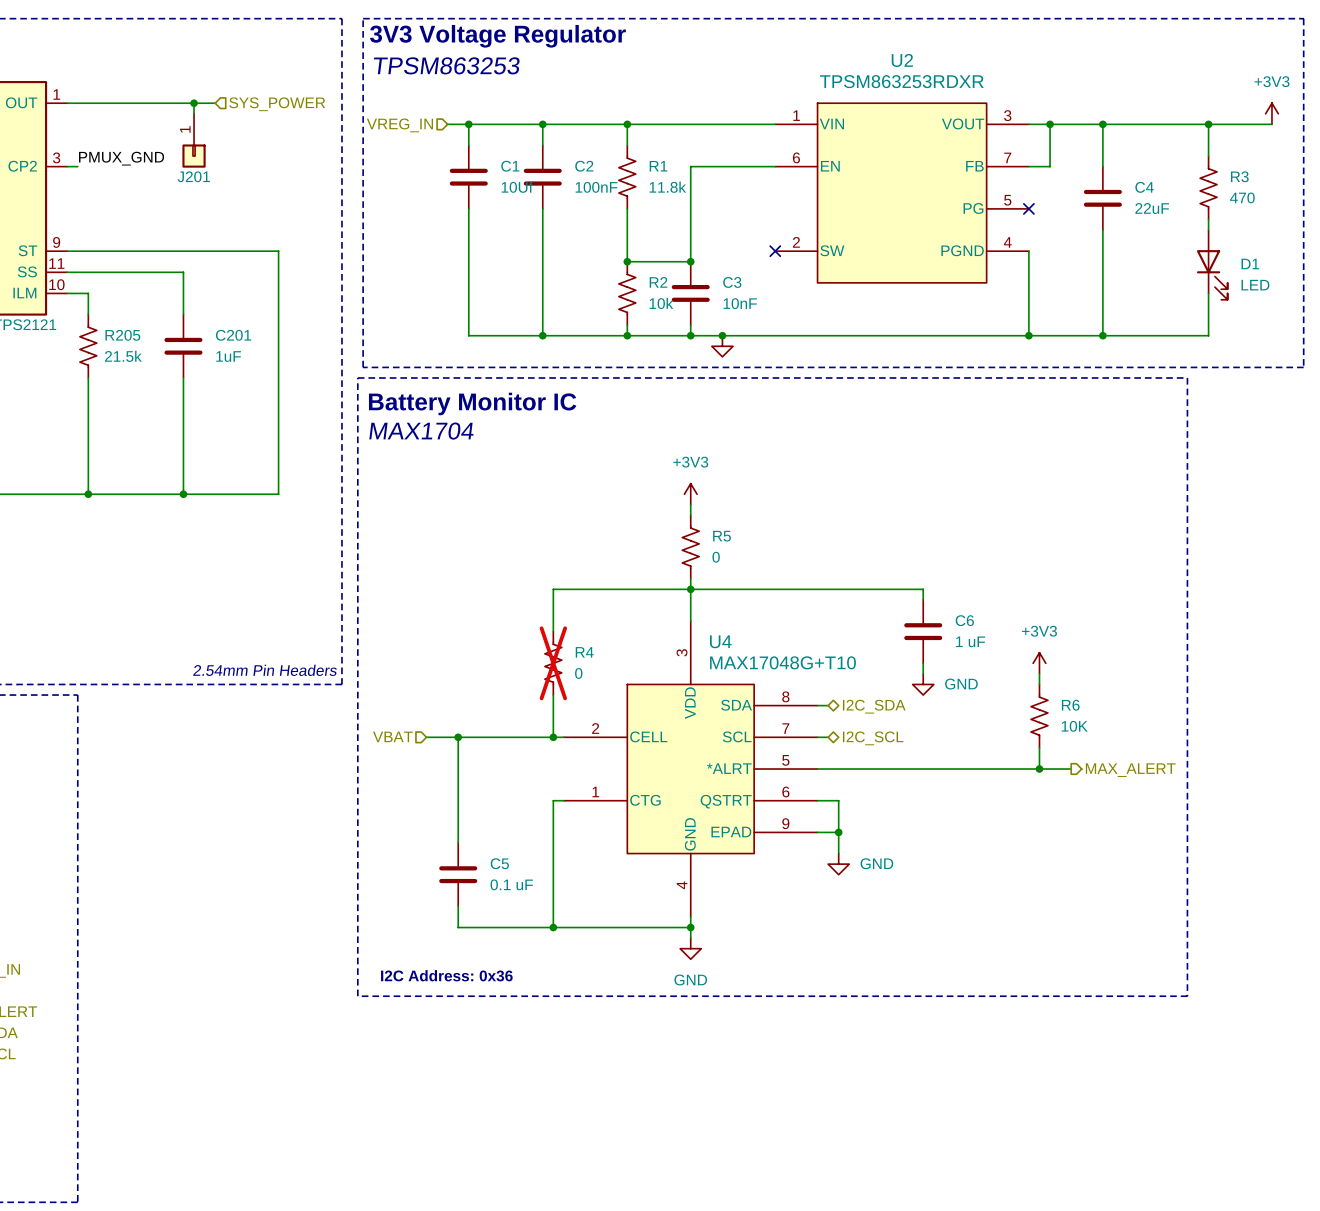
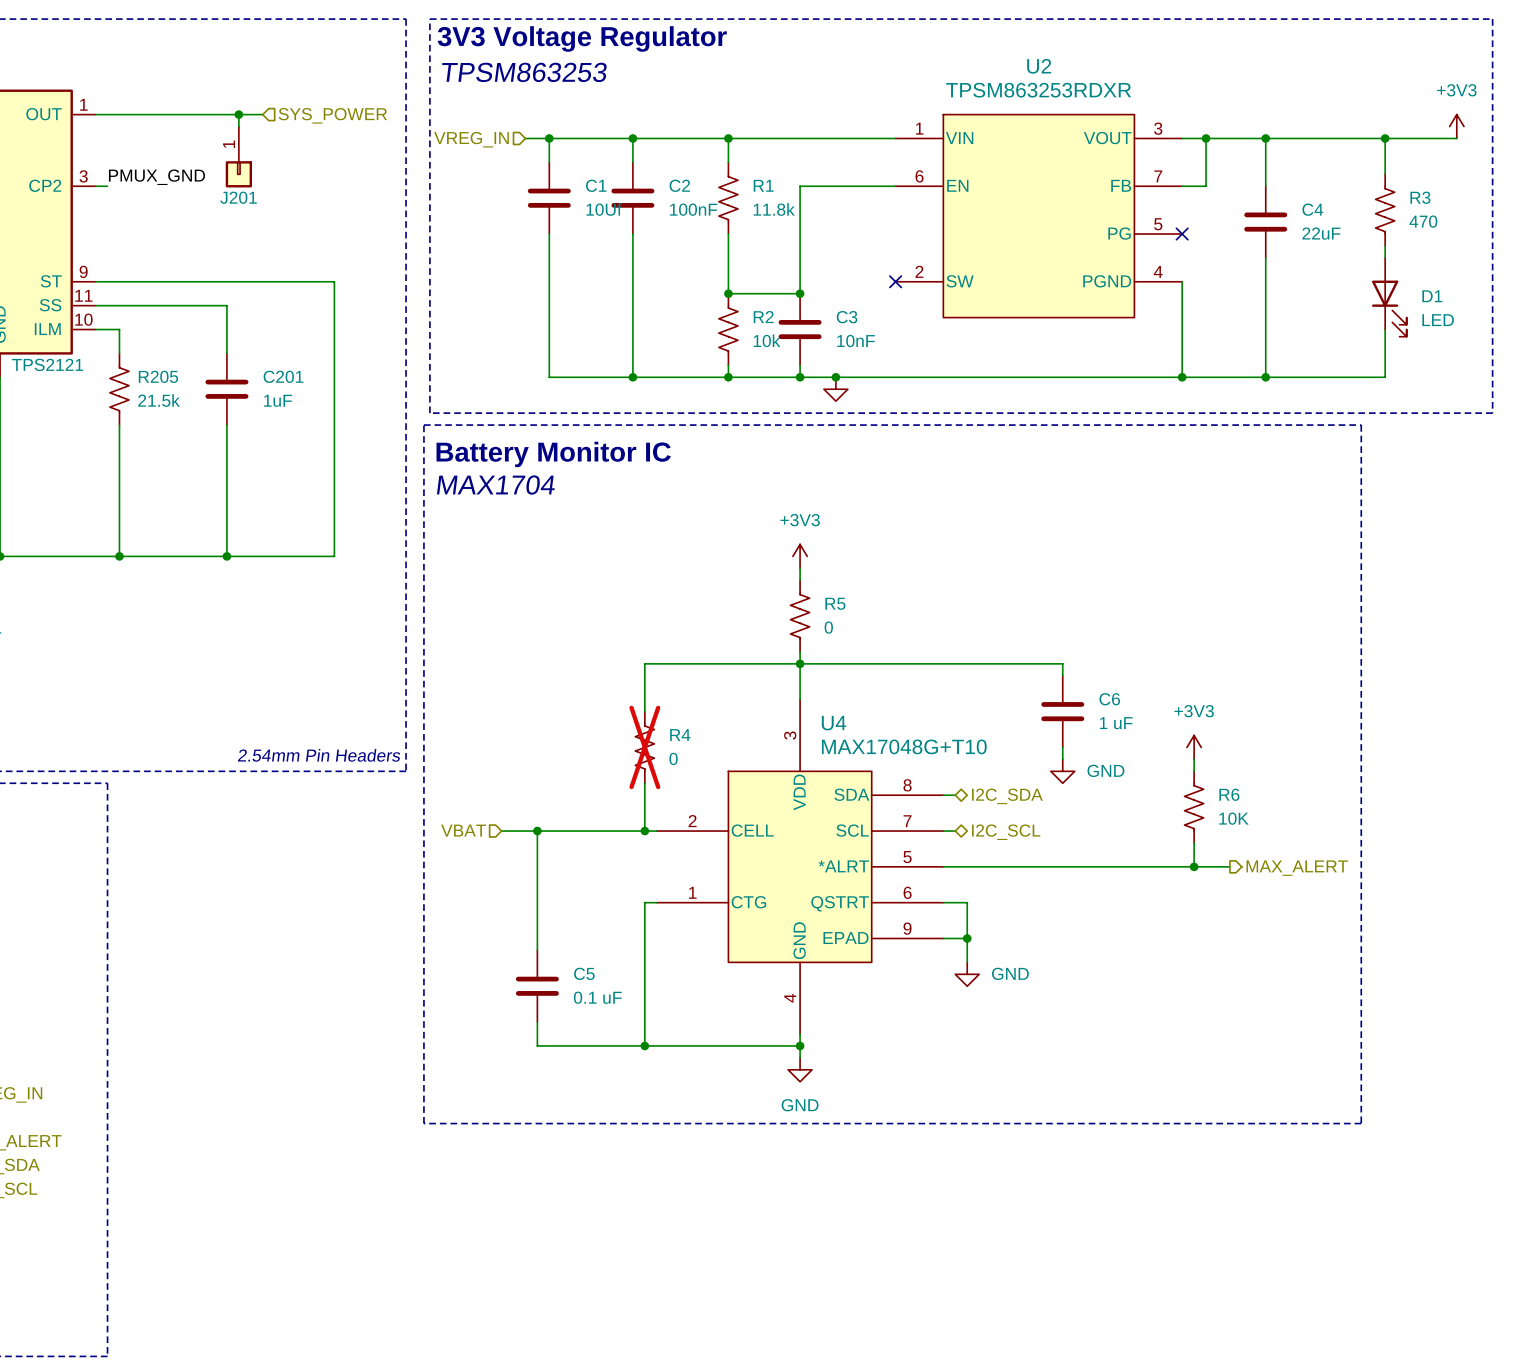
text: I2C Address: 0x36 (446, 975) -> none

